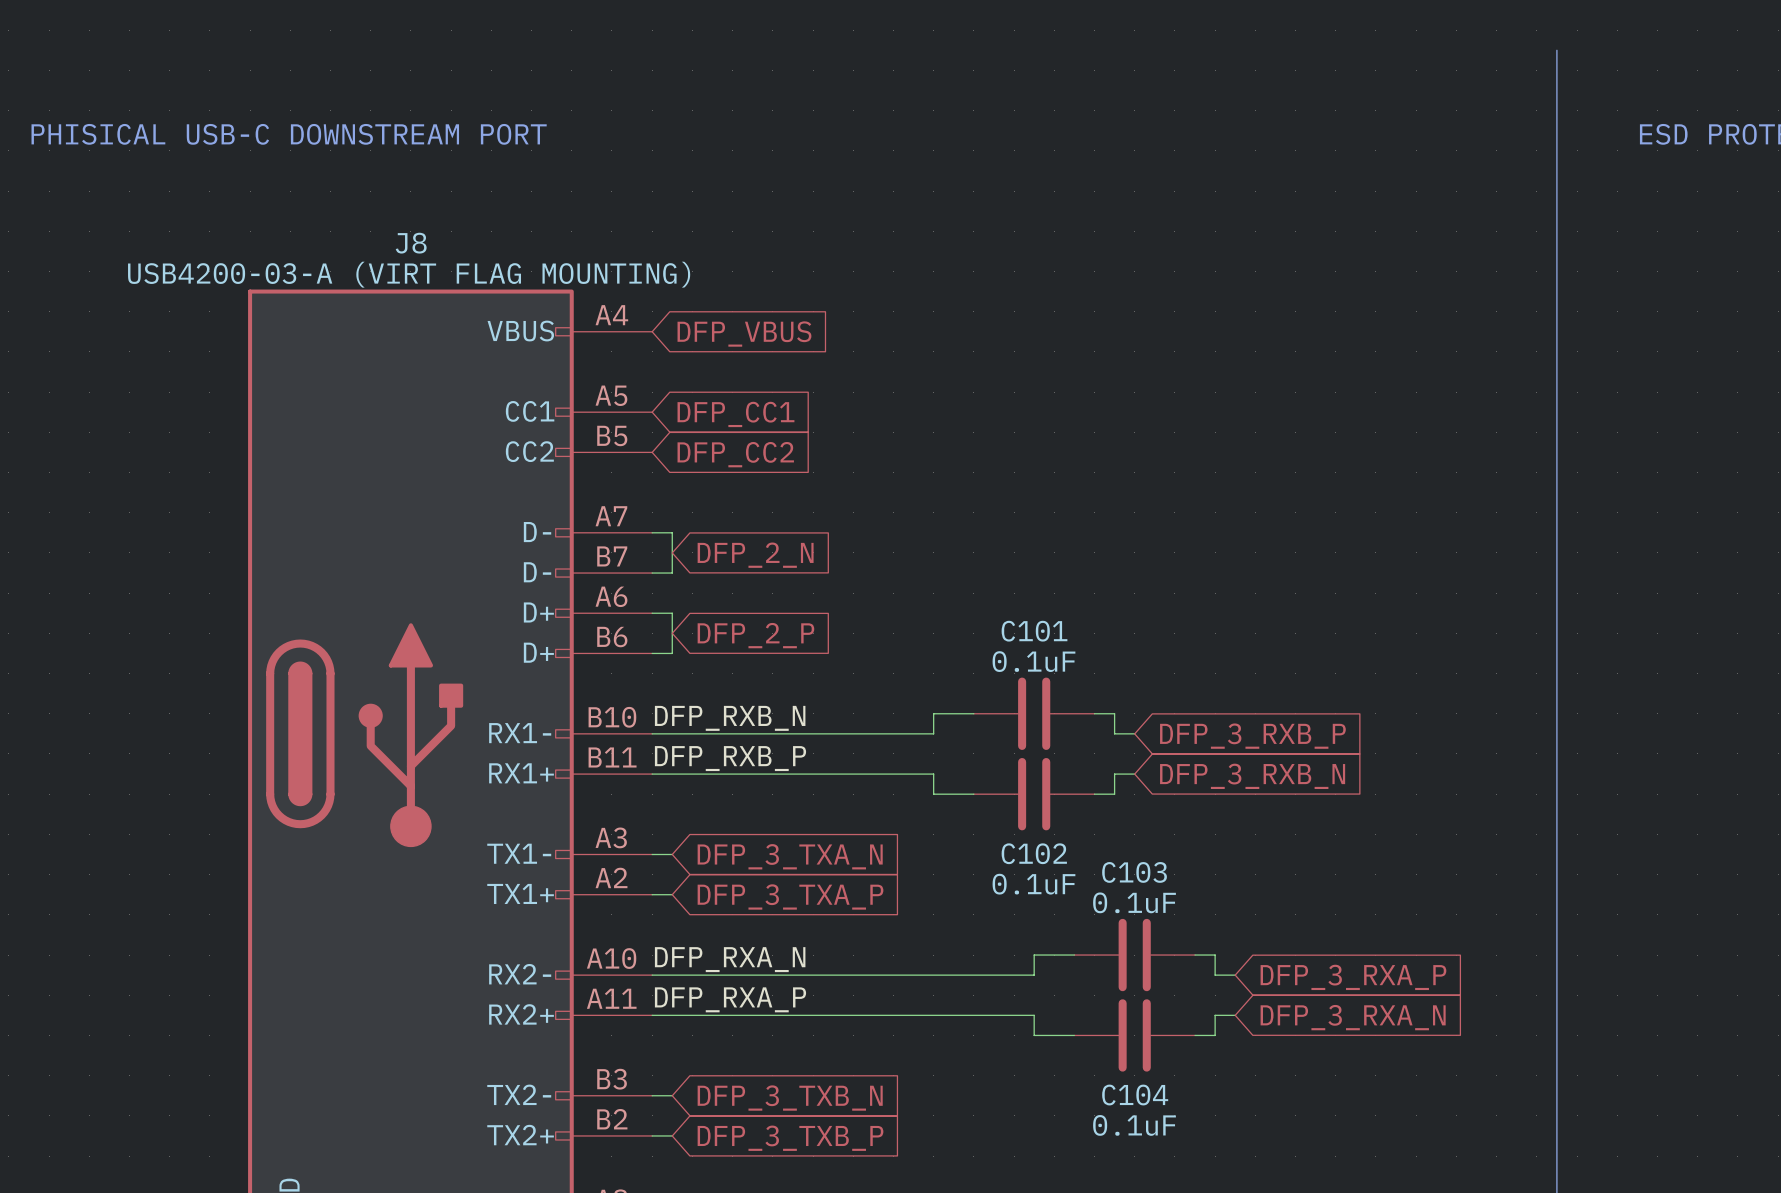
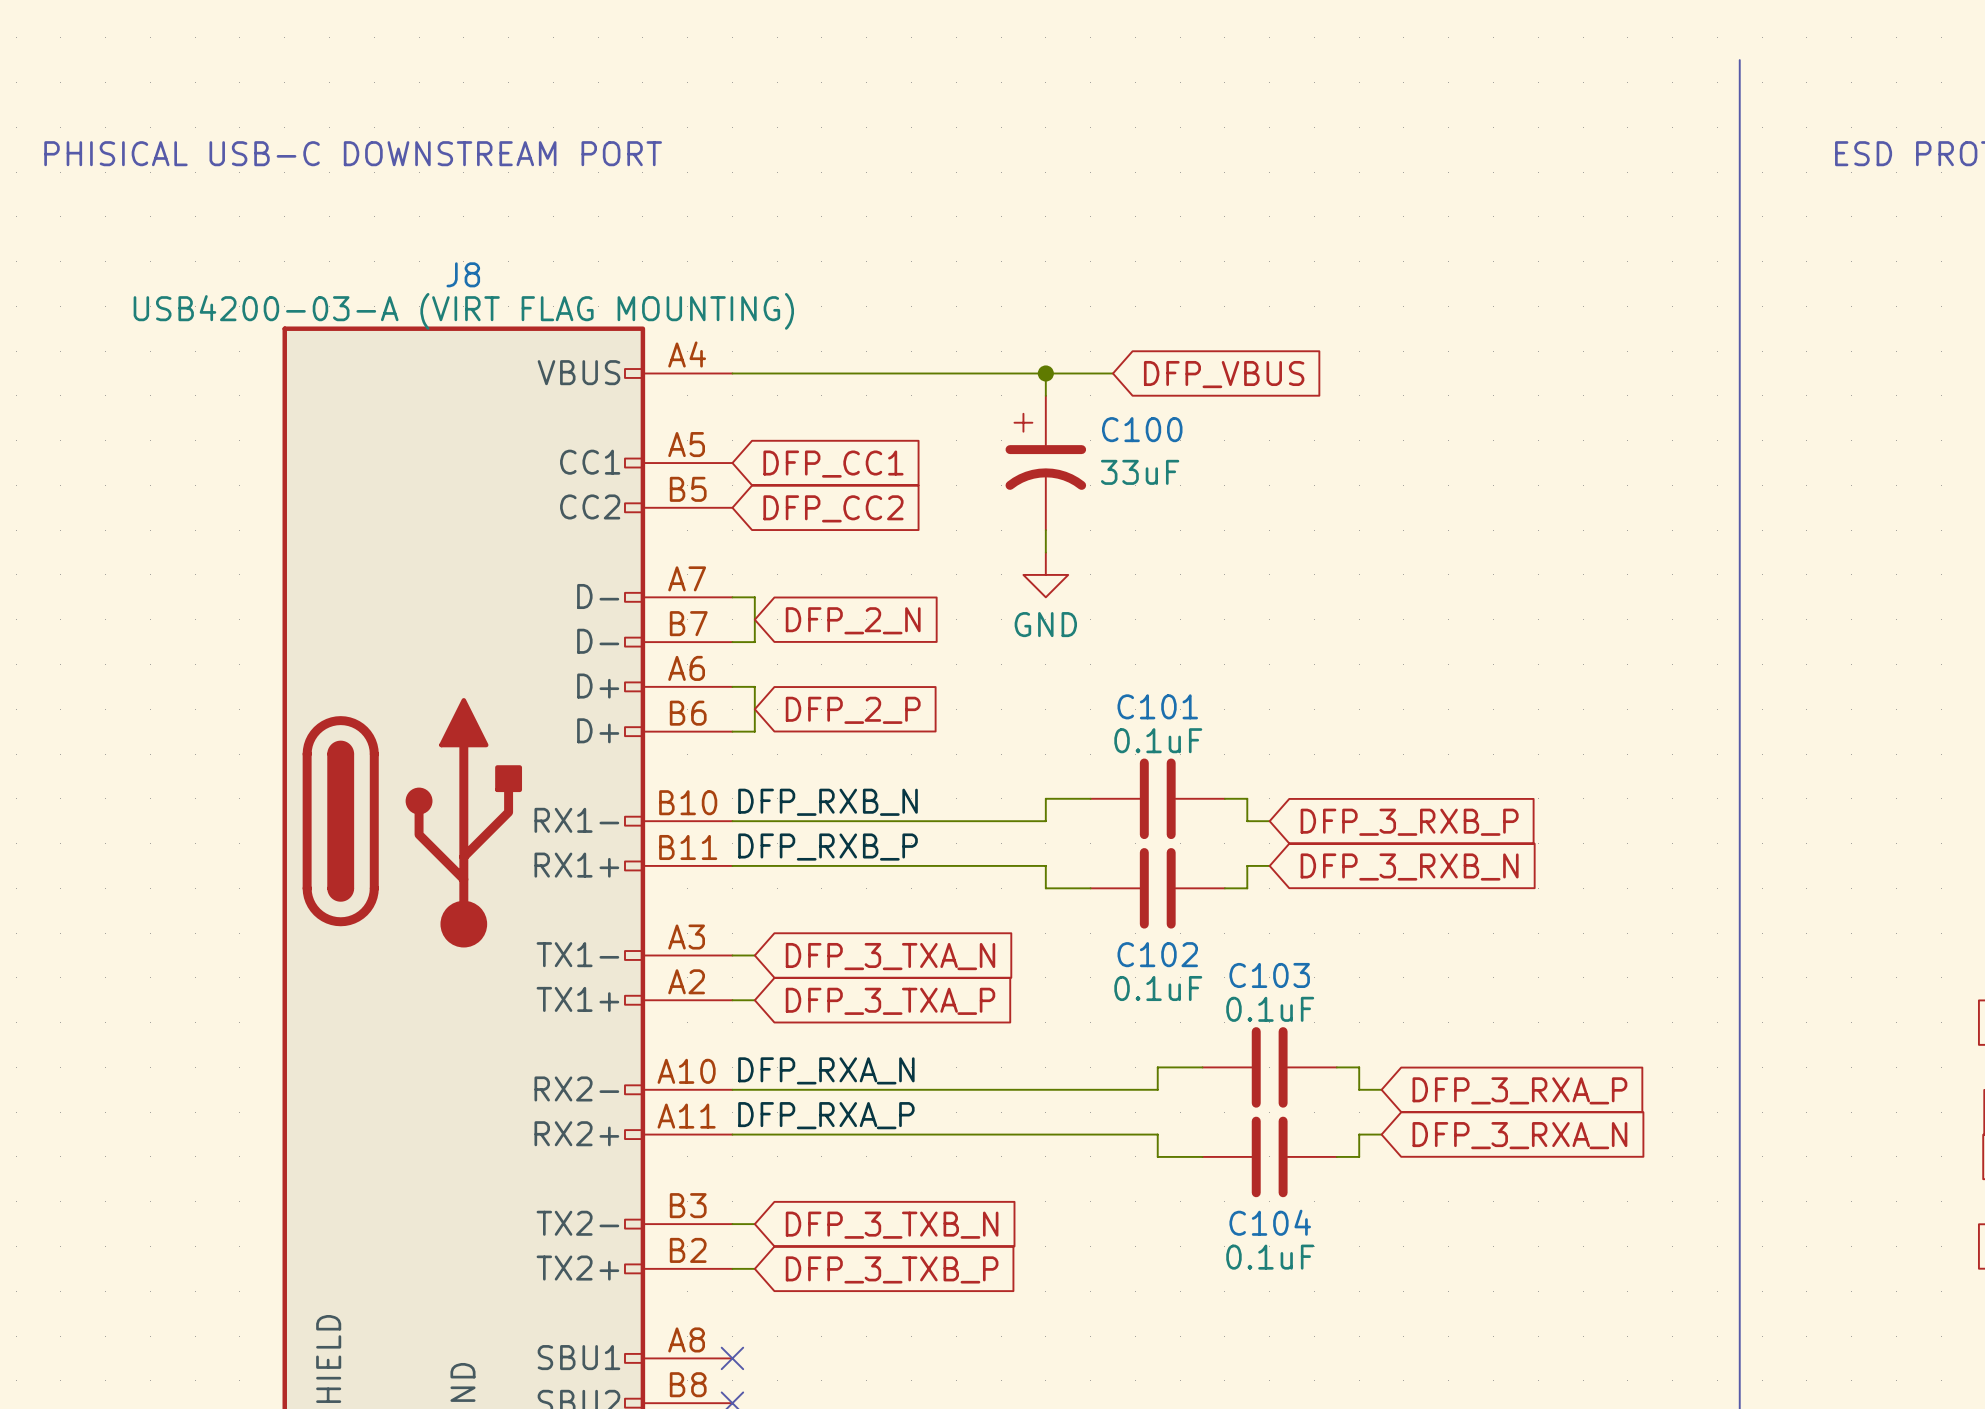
wire: none -> (732, 373) (1112, 373)
wire: none -> (1045, 373) (1045, 395)
junction: none -> (1045, 373)
global label position: DFP_VBUS (744, 334) -> DFP_VBUS (1224, 374)
C100: none -> 33uF (1045, 463)
wire: none -> (1045, 530) (1045, 552)
power symbol: none -> GND (1045, 574)

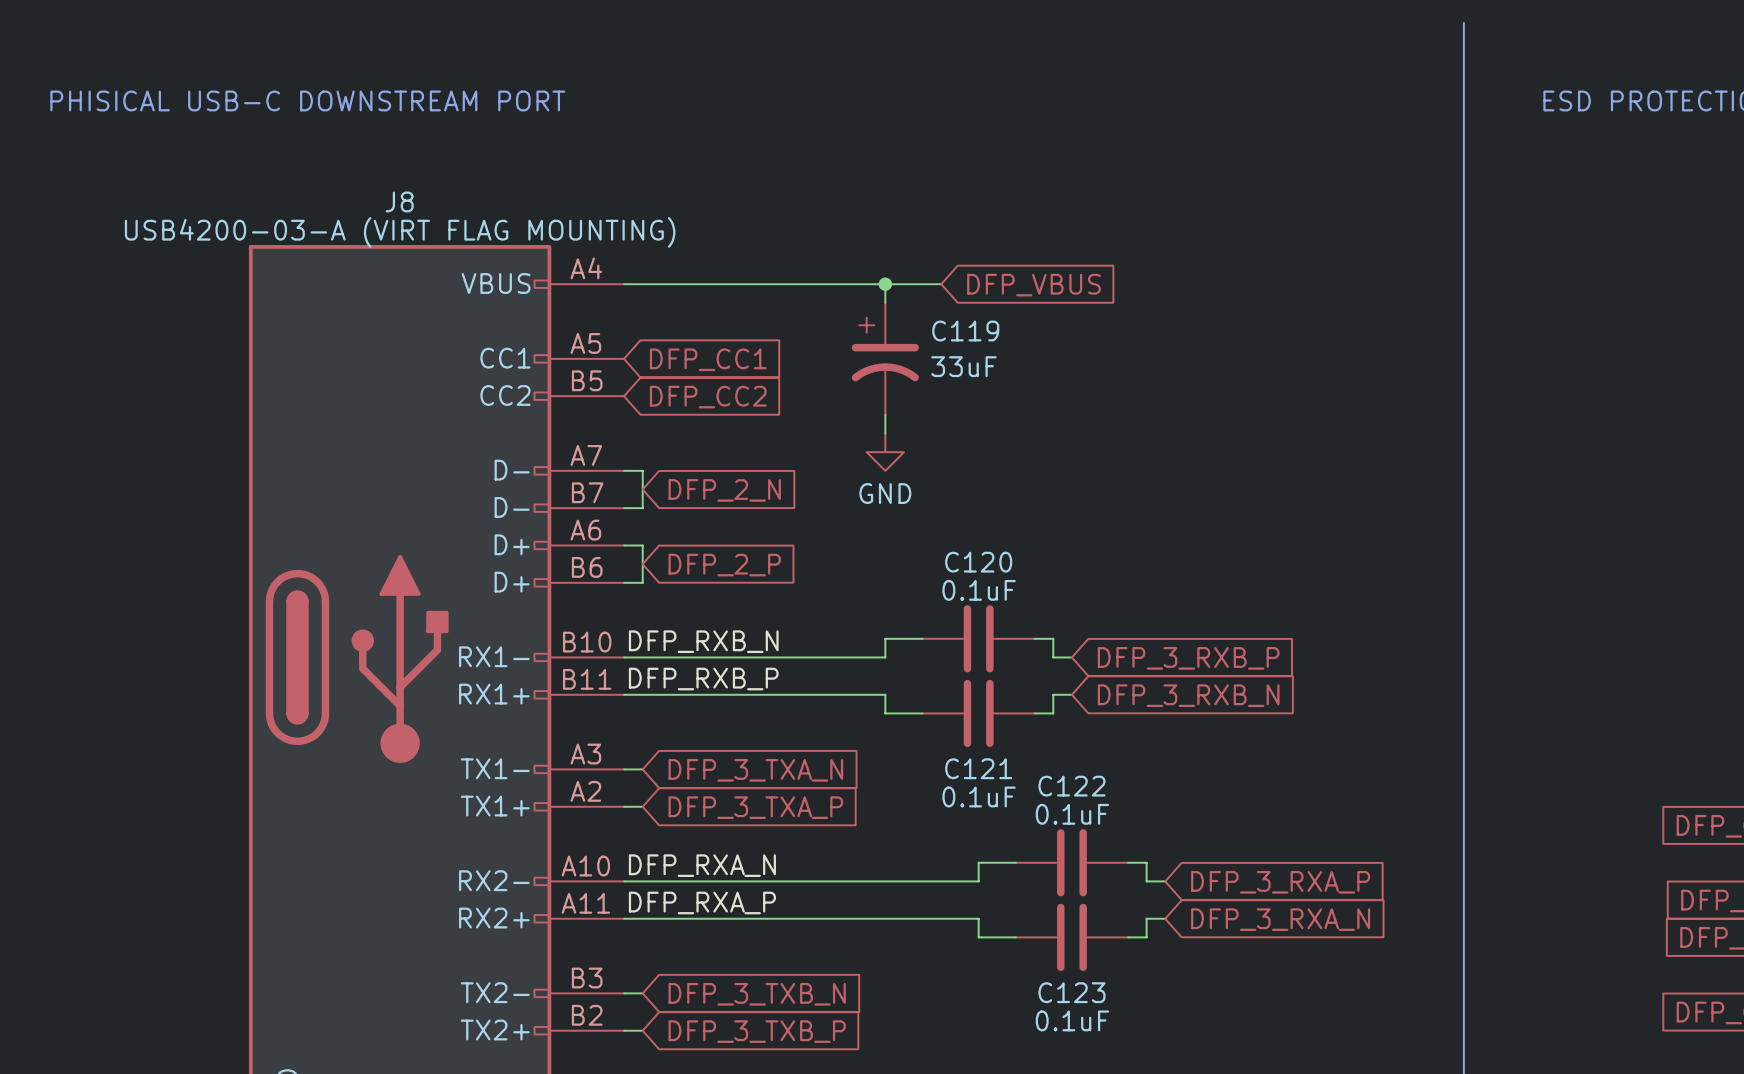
C100 name: C100 (1142, 429) -> C119 (965, 331)
C101 name: C101 (1157, 706) -> C120 (978, 562)
C102 name: C102 (1157, 954) -> C121 (978, 768)
C103 name: C103 (1269, 975) -> C122 (1071, 786)
C104 name: C104 (1270, 1222) -> C123 (1071, 992)

